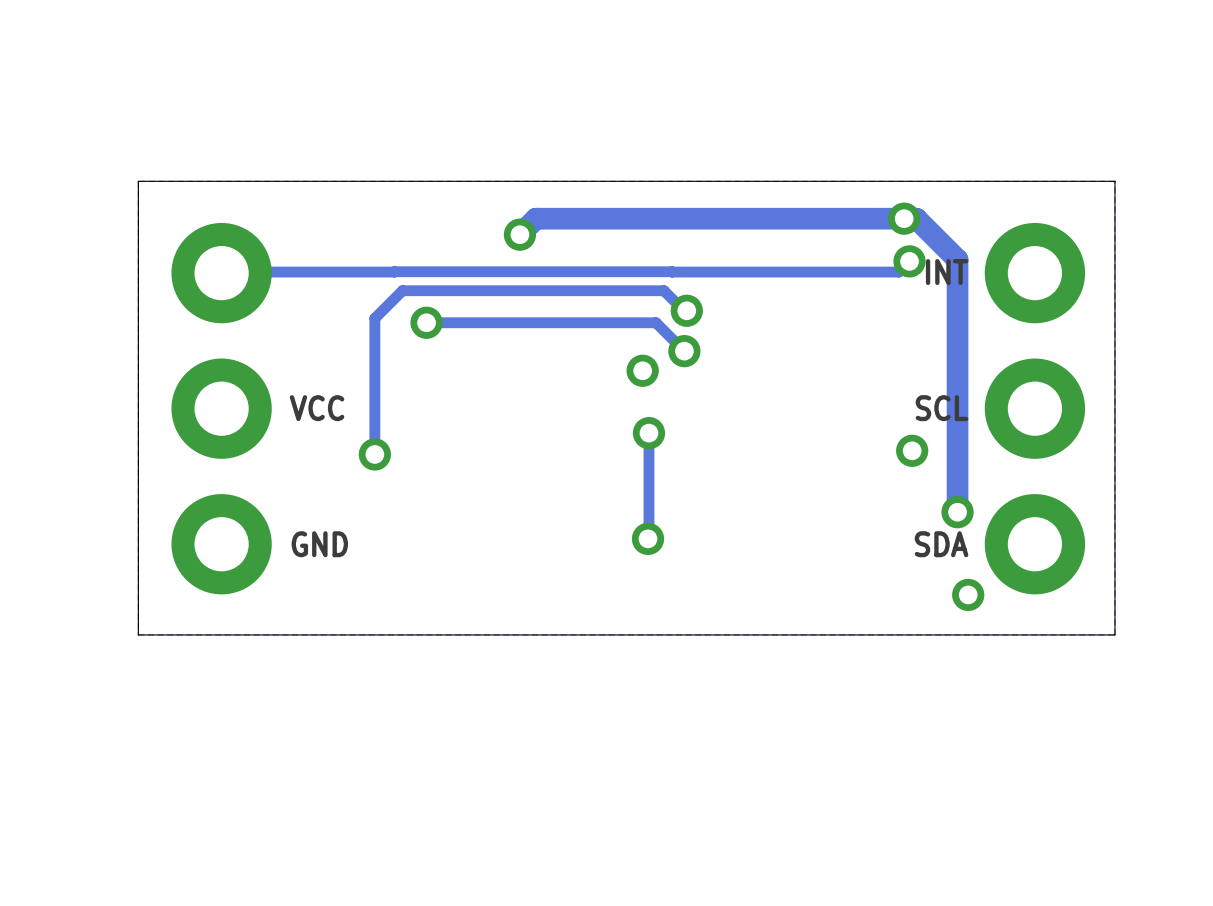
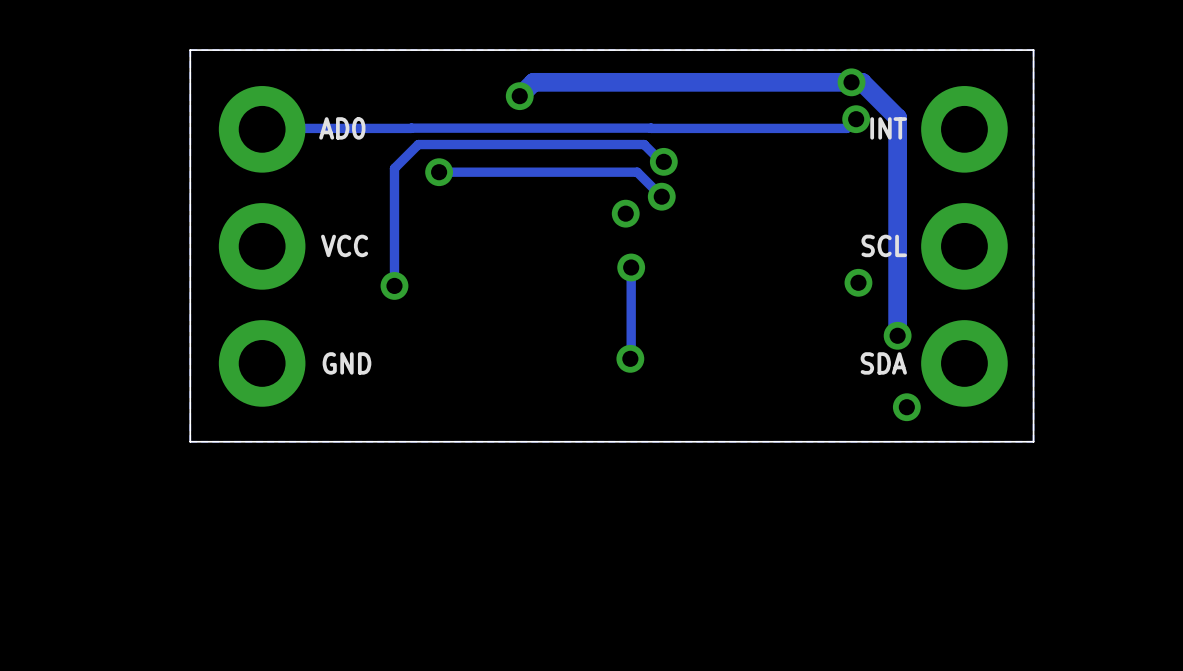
text: none -> AD0 (342, 128)

